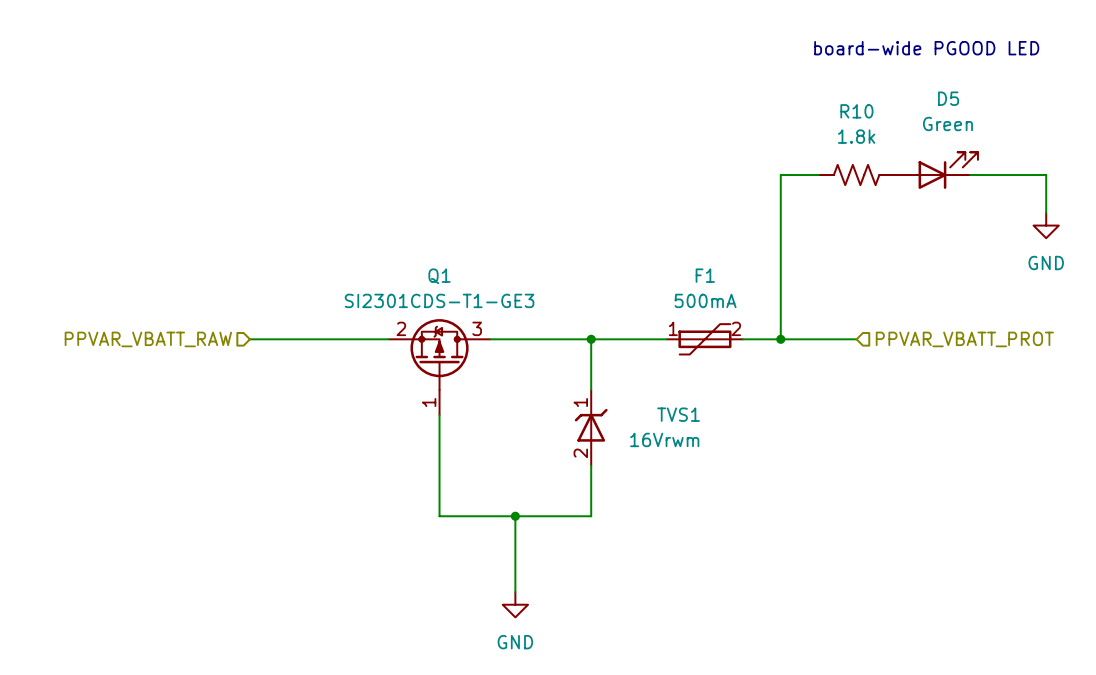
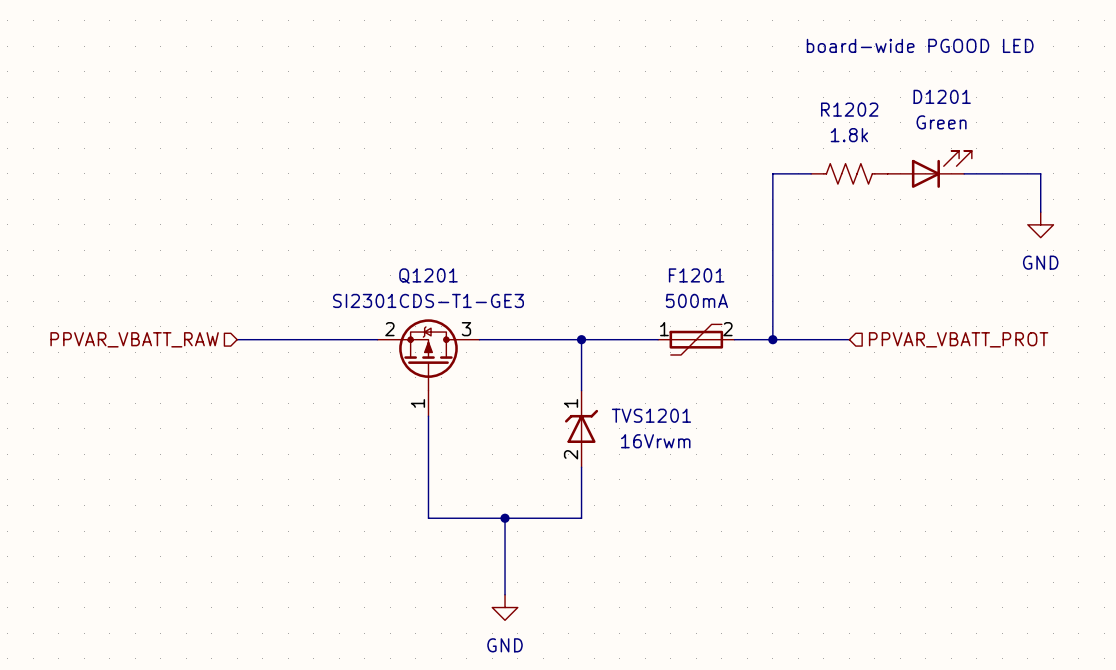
D5 name: D5 (948, 98) -> D1201 (942, 96)
R10 name: R10 (856, 111) -> R1202 (849, 109)
F1 name: F1 (705, 275) -> F1201 (696, 275)
Q1 name: Q1 (439, 276) -> Q1201 (428, 276)
TVS1 name: TVS1 (678, 414) -> TVS1201 (651, 415)

